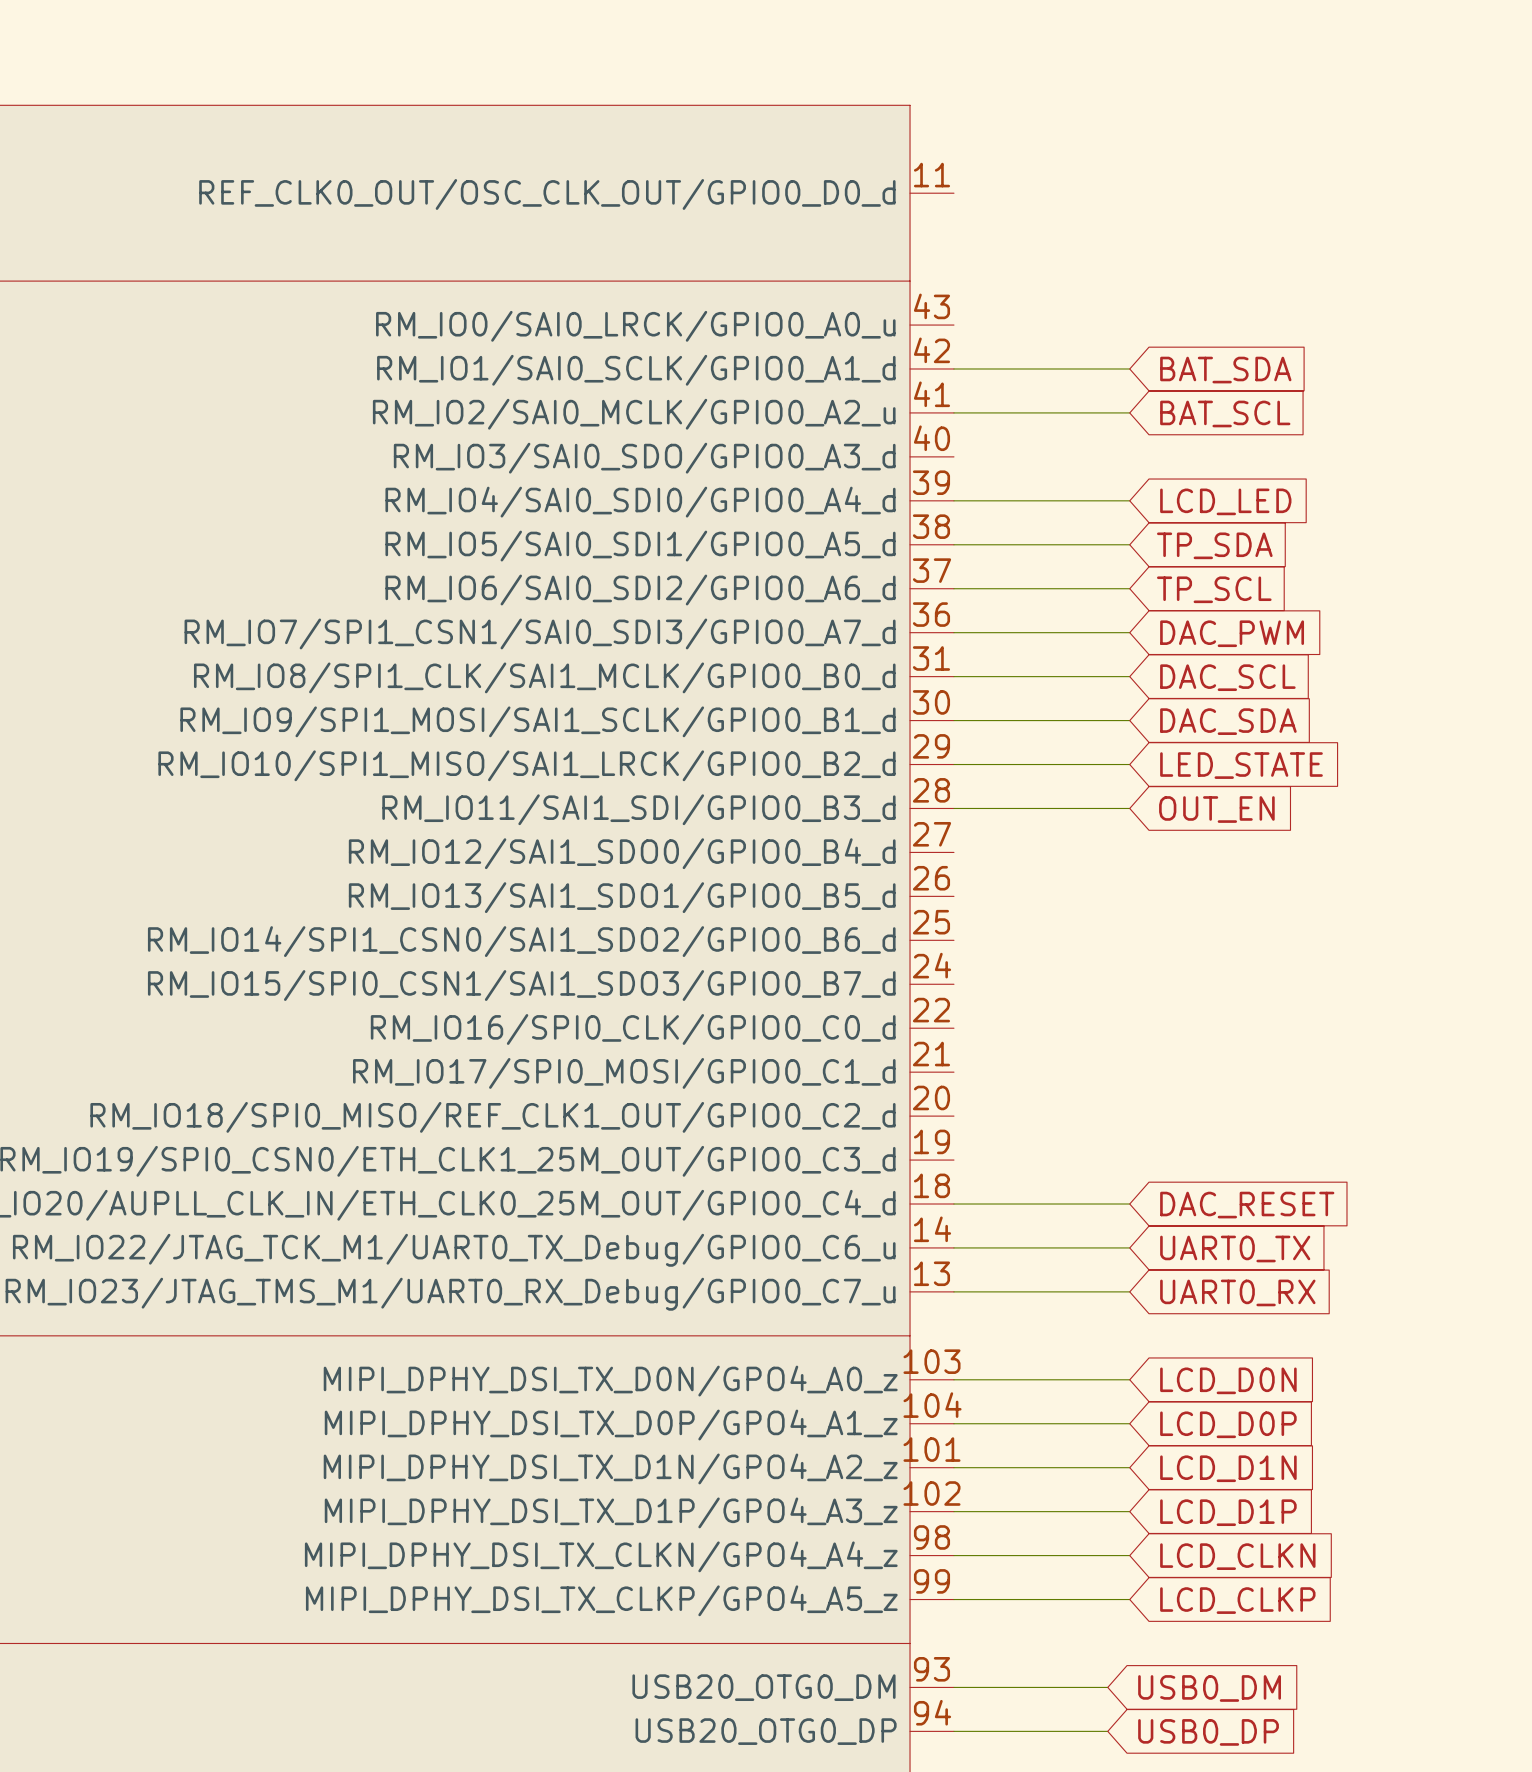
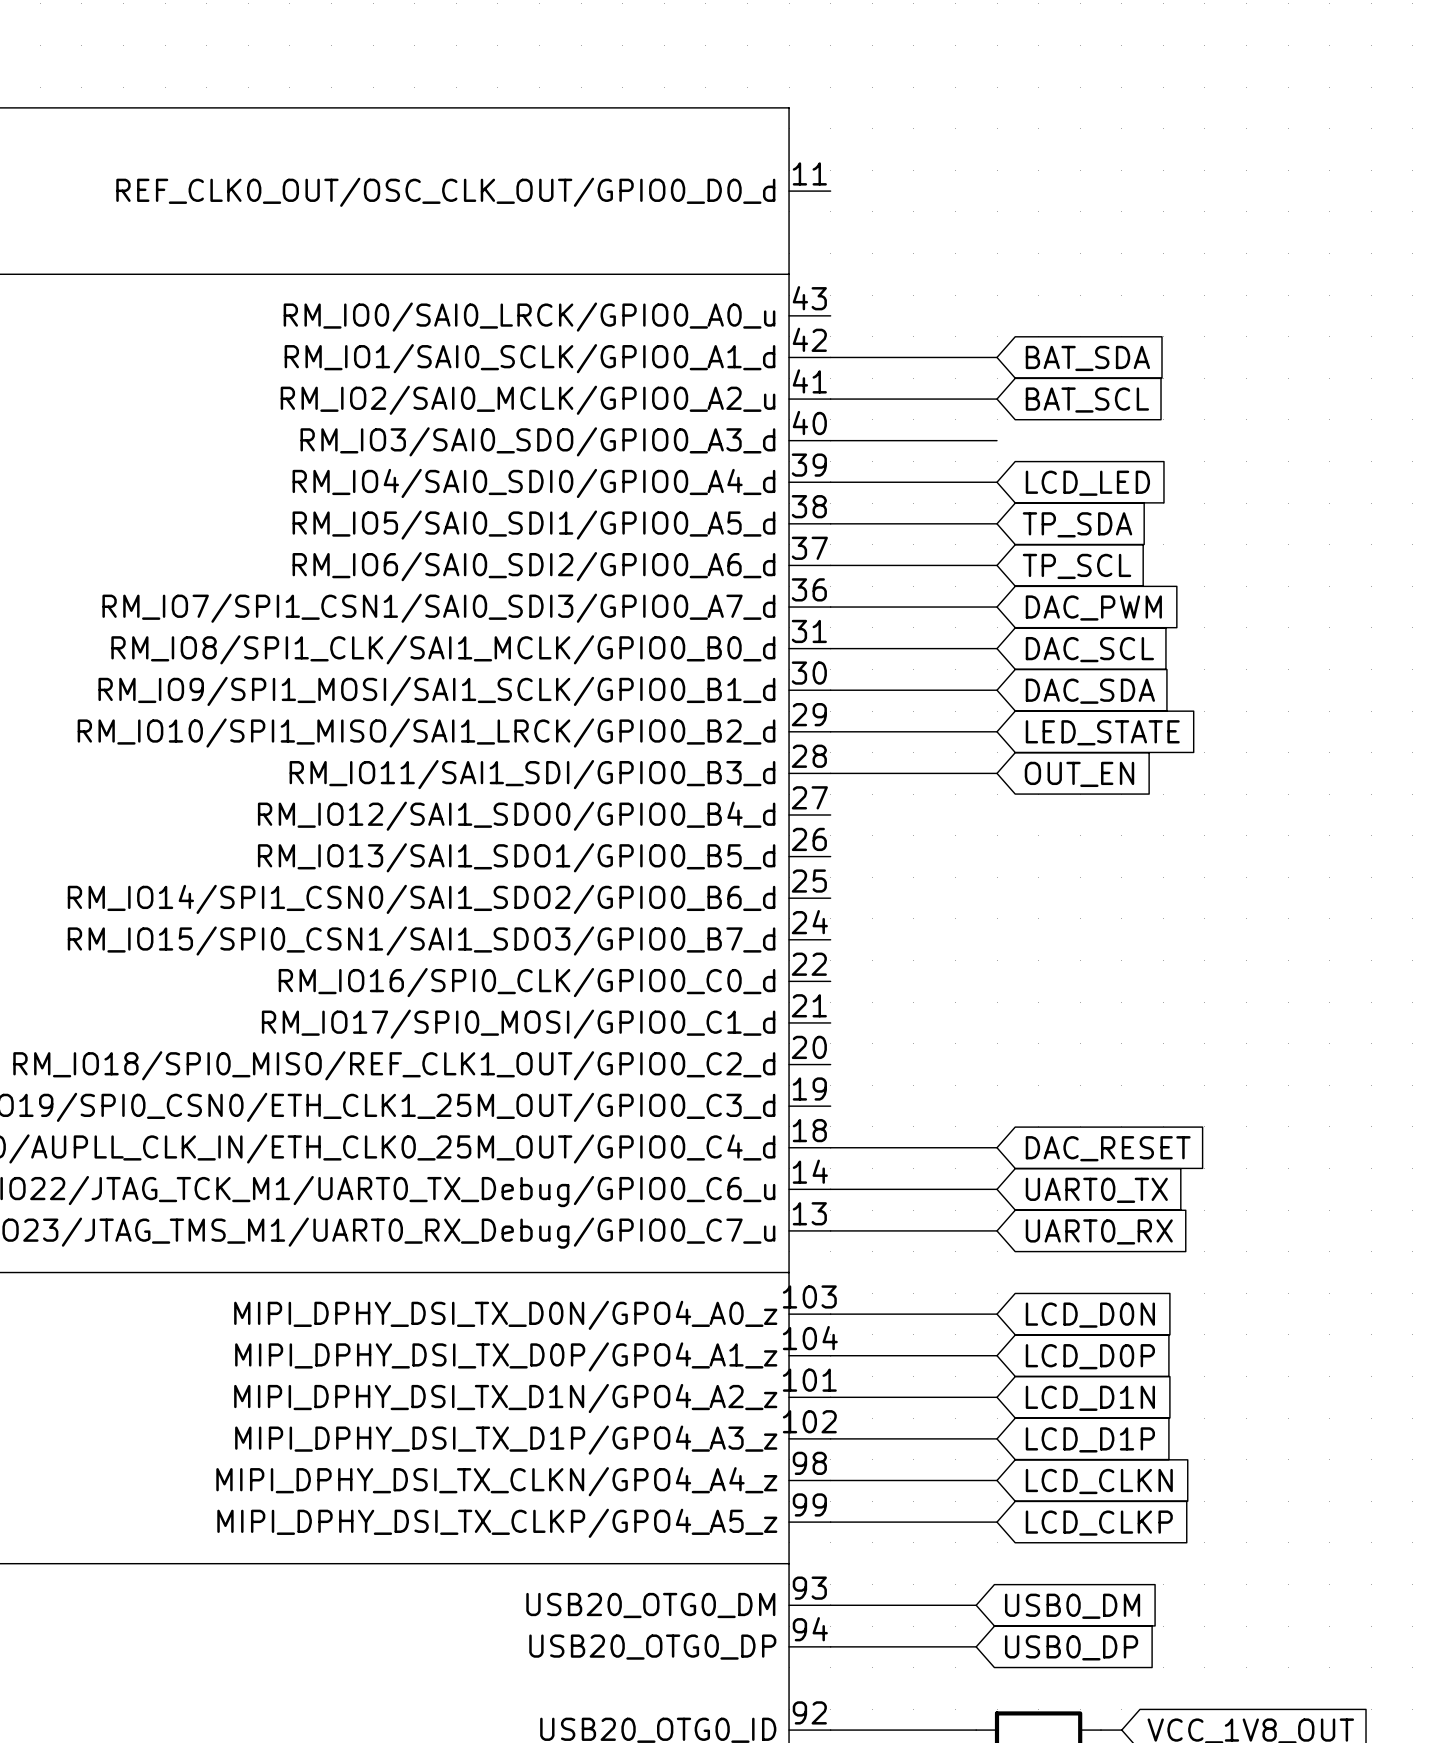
wire: none -> (830, 440) (997, 440)

